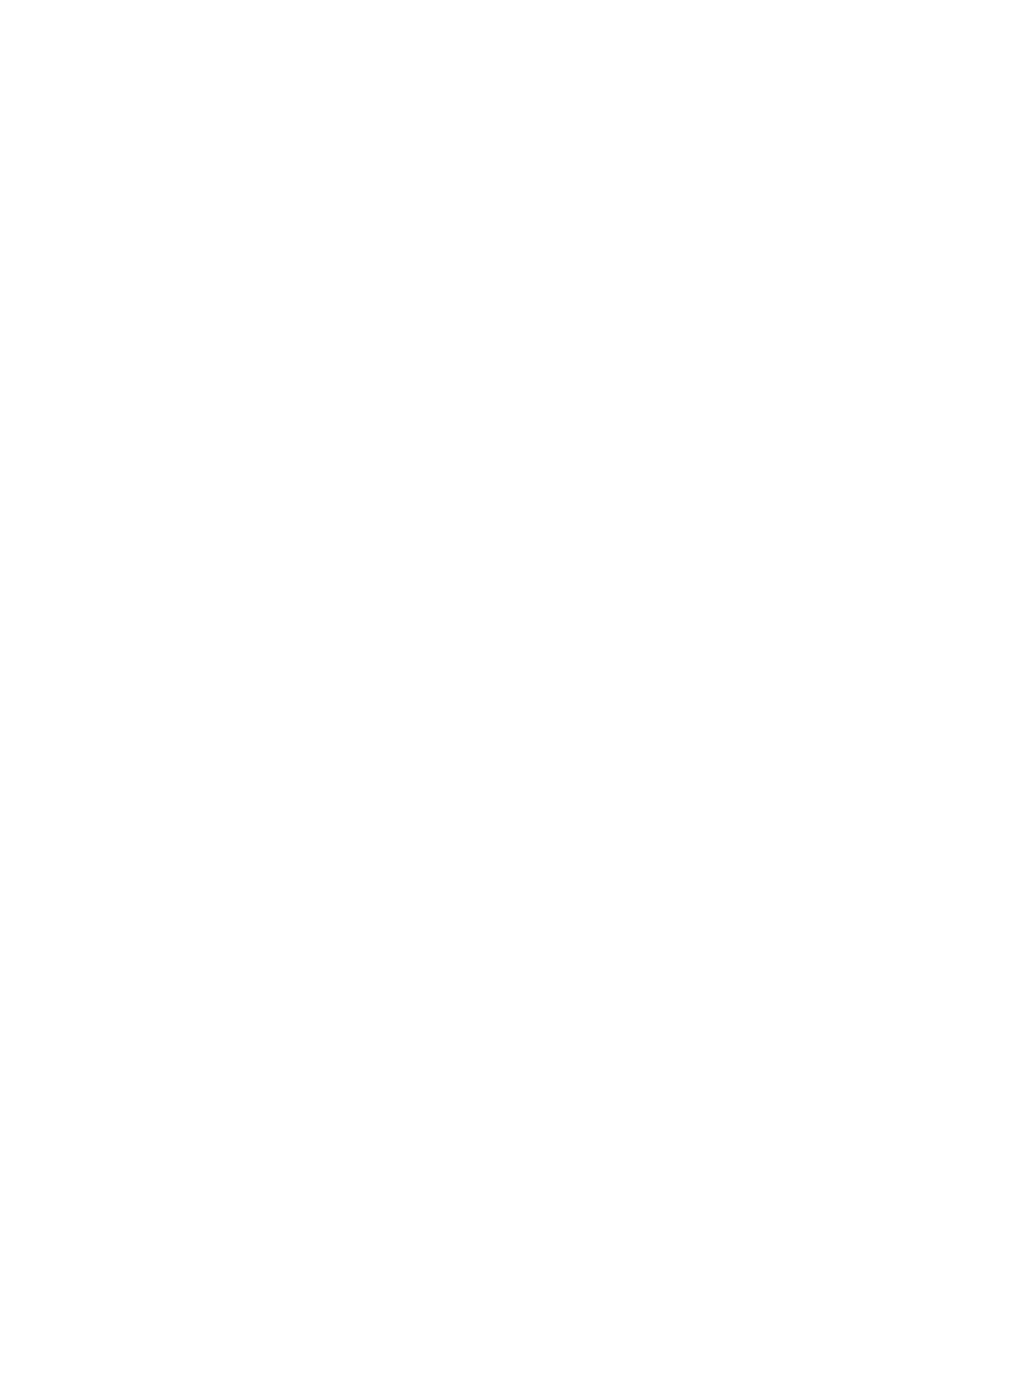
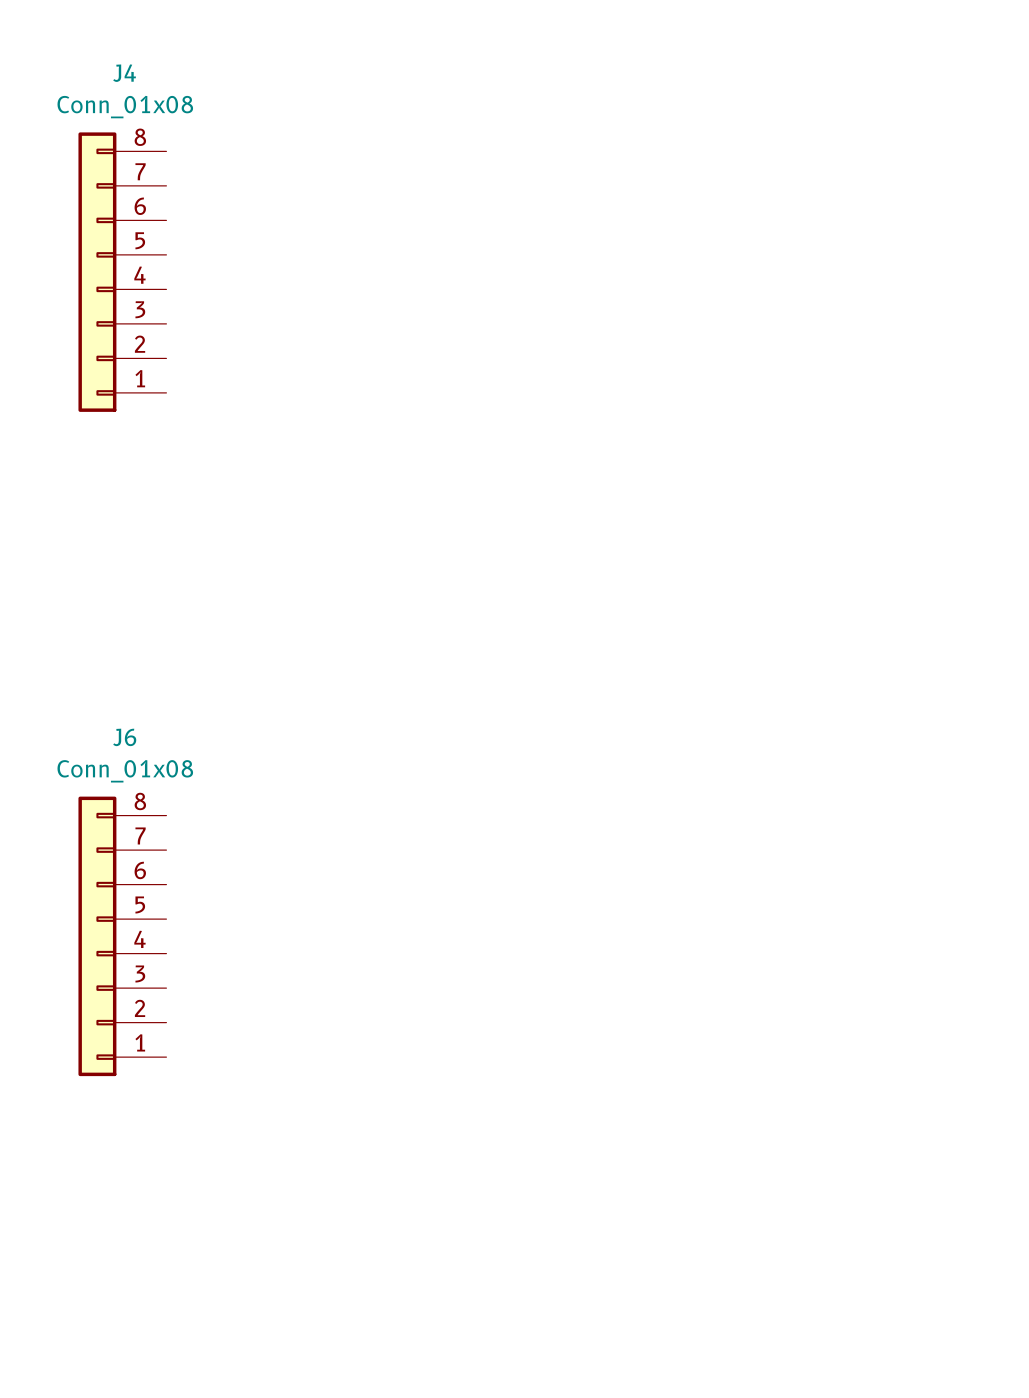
J4: none -> Conn_01x08 (122, 272)
J6: none -> Conn_01x08 (122, 936)

